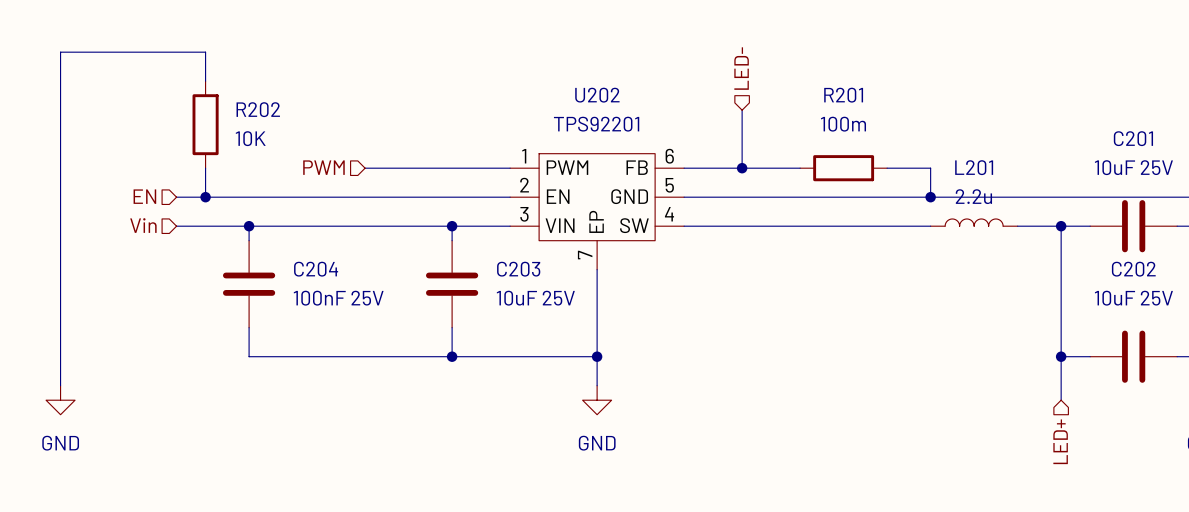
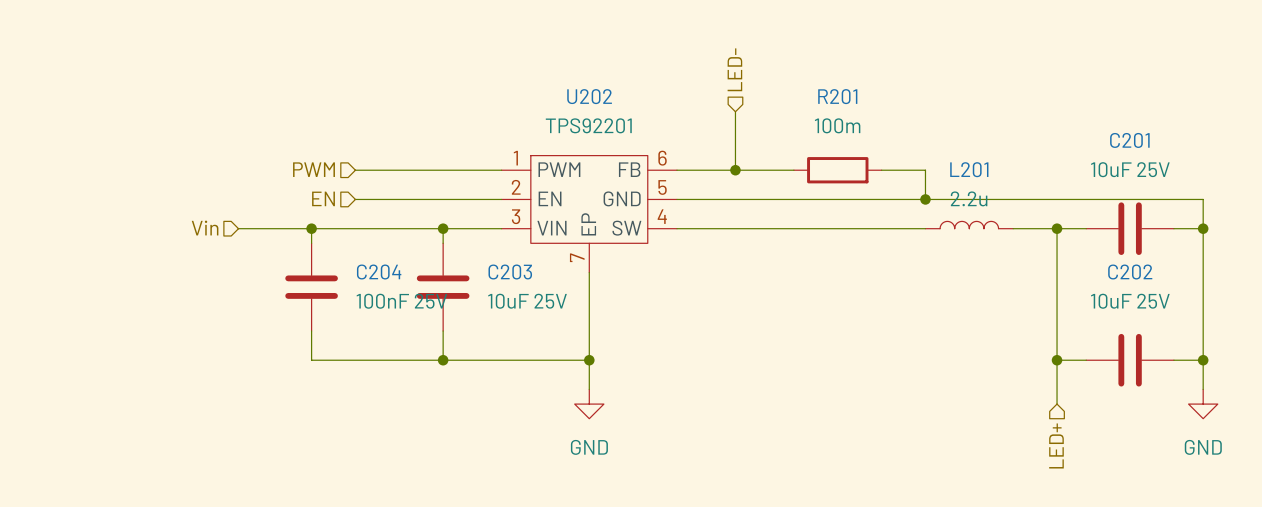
wire: (205, 81) (205, 52) (60, 52) (60, 385) -> none
R202: 10K (205, 124) -> none
wire: (205, 168) (205, 197) -> none
hierarchical label position: EN (144, 196) -> EN (323, 198)
wire: (176, 197) (365, 197) -> none
junction: (205, 197) -> none
hierarchical label position: Vin (143, 225) -> Vin (205, 228)
wire: (176, 226) (249, 226) (249, 240) -> none
junction: (249, 226) -> none
wire: none -> (311, 228) (311, 243)
junction: none -> (311, 228)
C204 position: (249, 284) -> (311, 287)
wire: (249, 327) (249, 356) (321, 356) -> (311, 331) (311, 360)
power symbol: GND (60, 400) -> none

